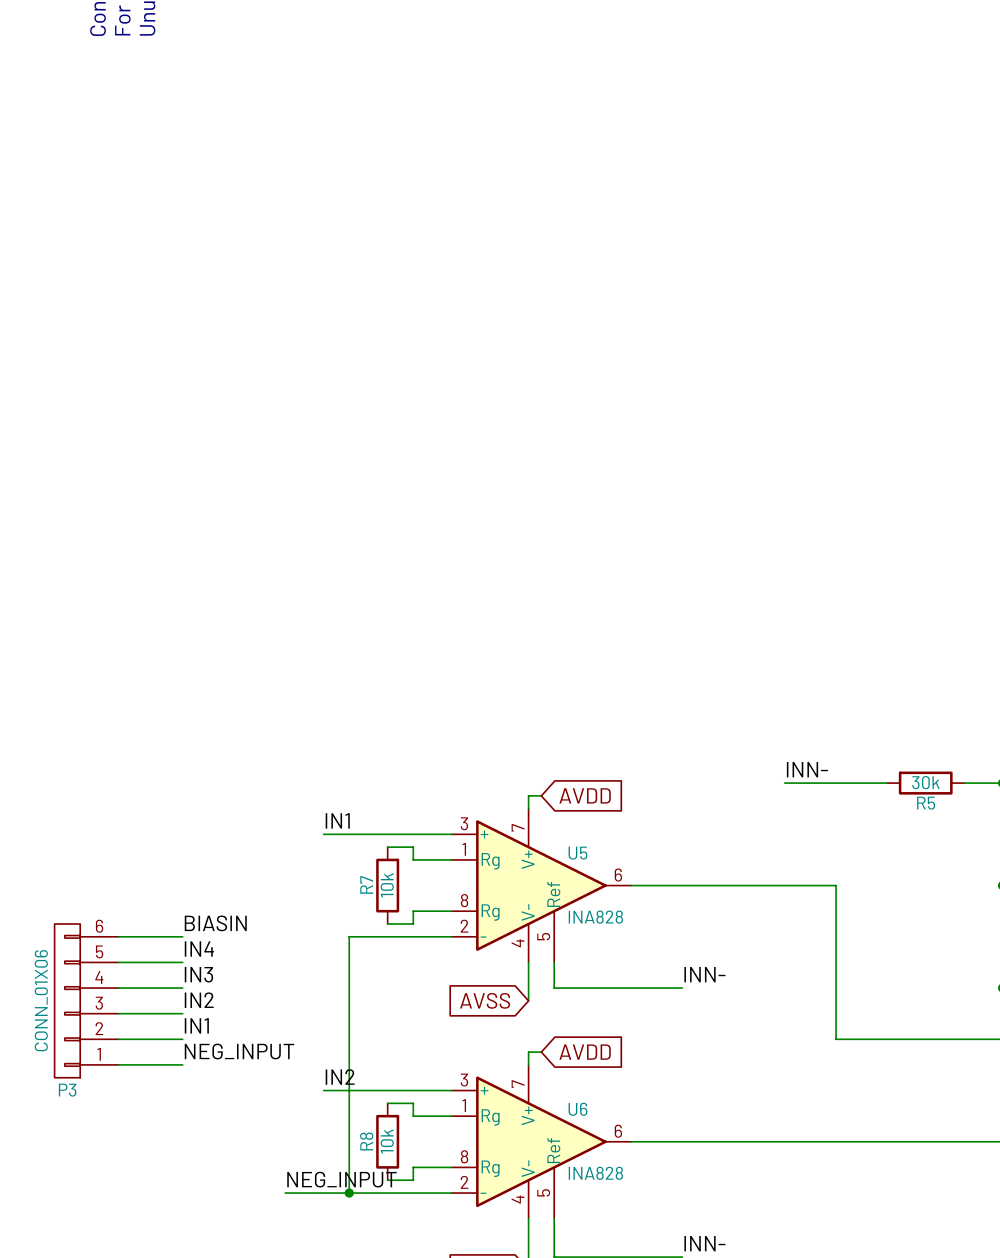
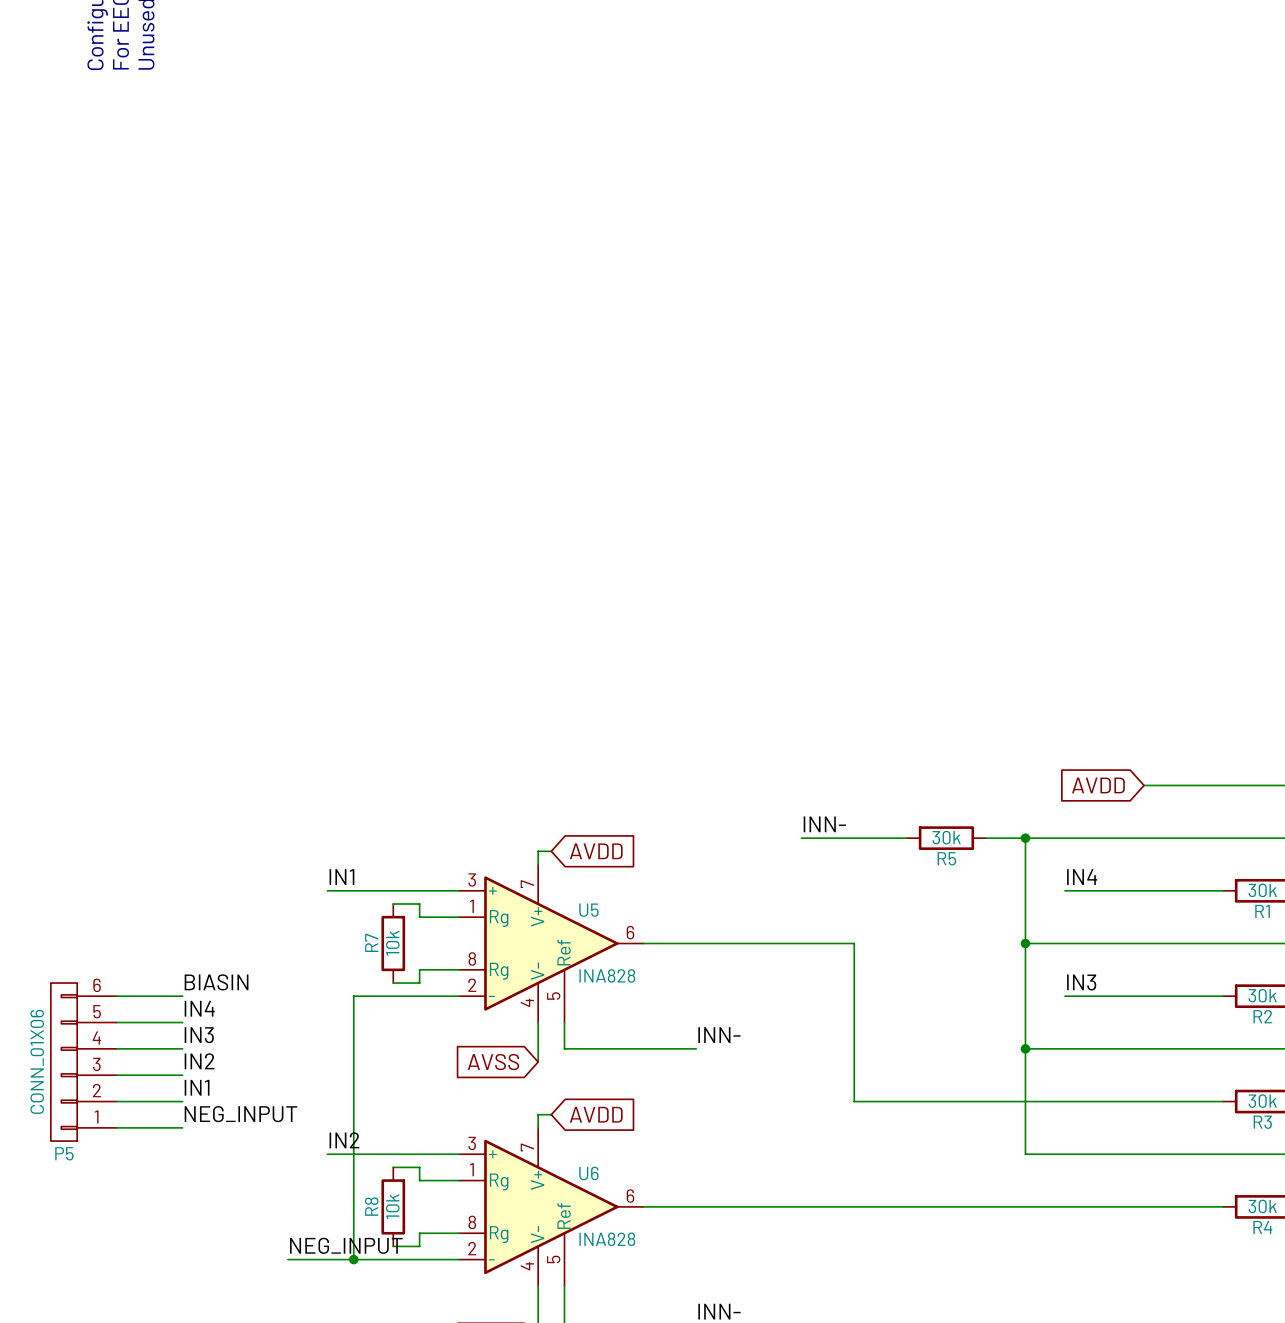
P3 name: P3 (67, 1090) -> P5 (64, 1153)

